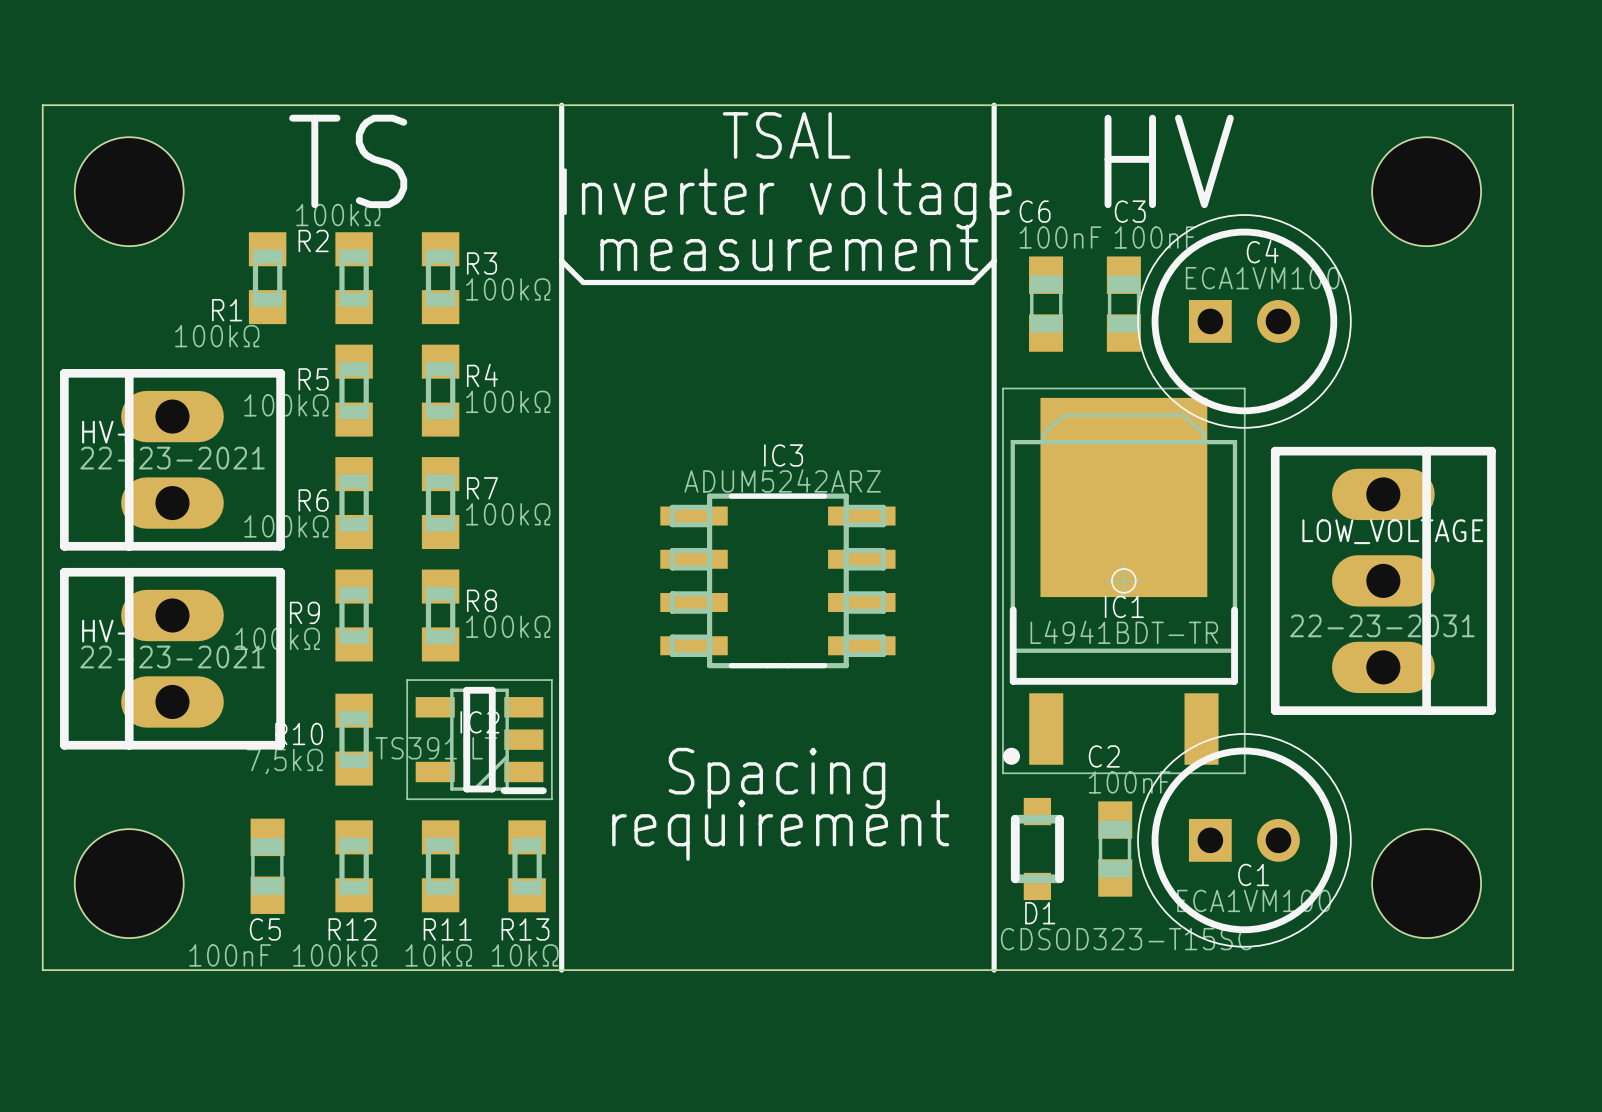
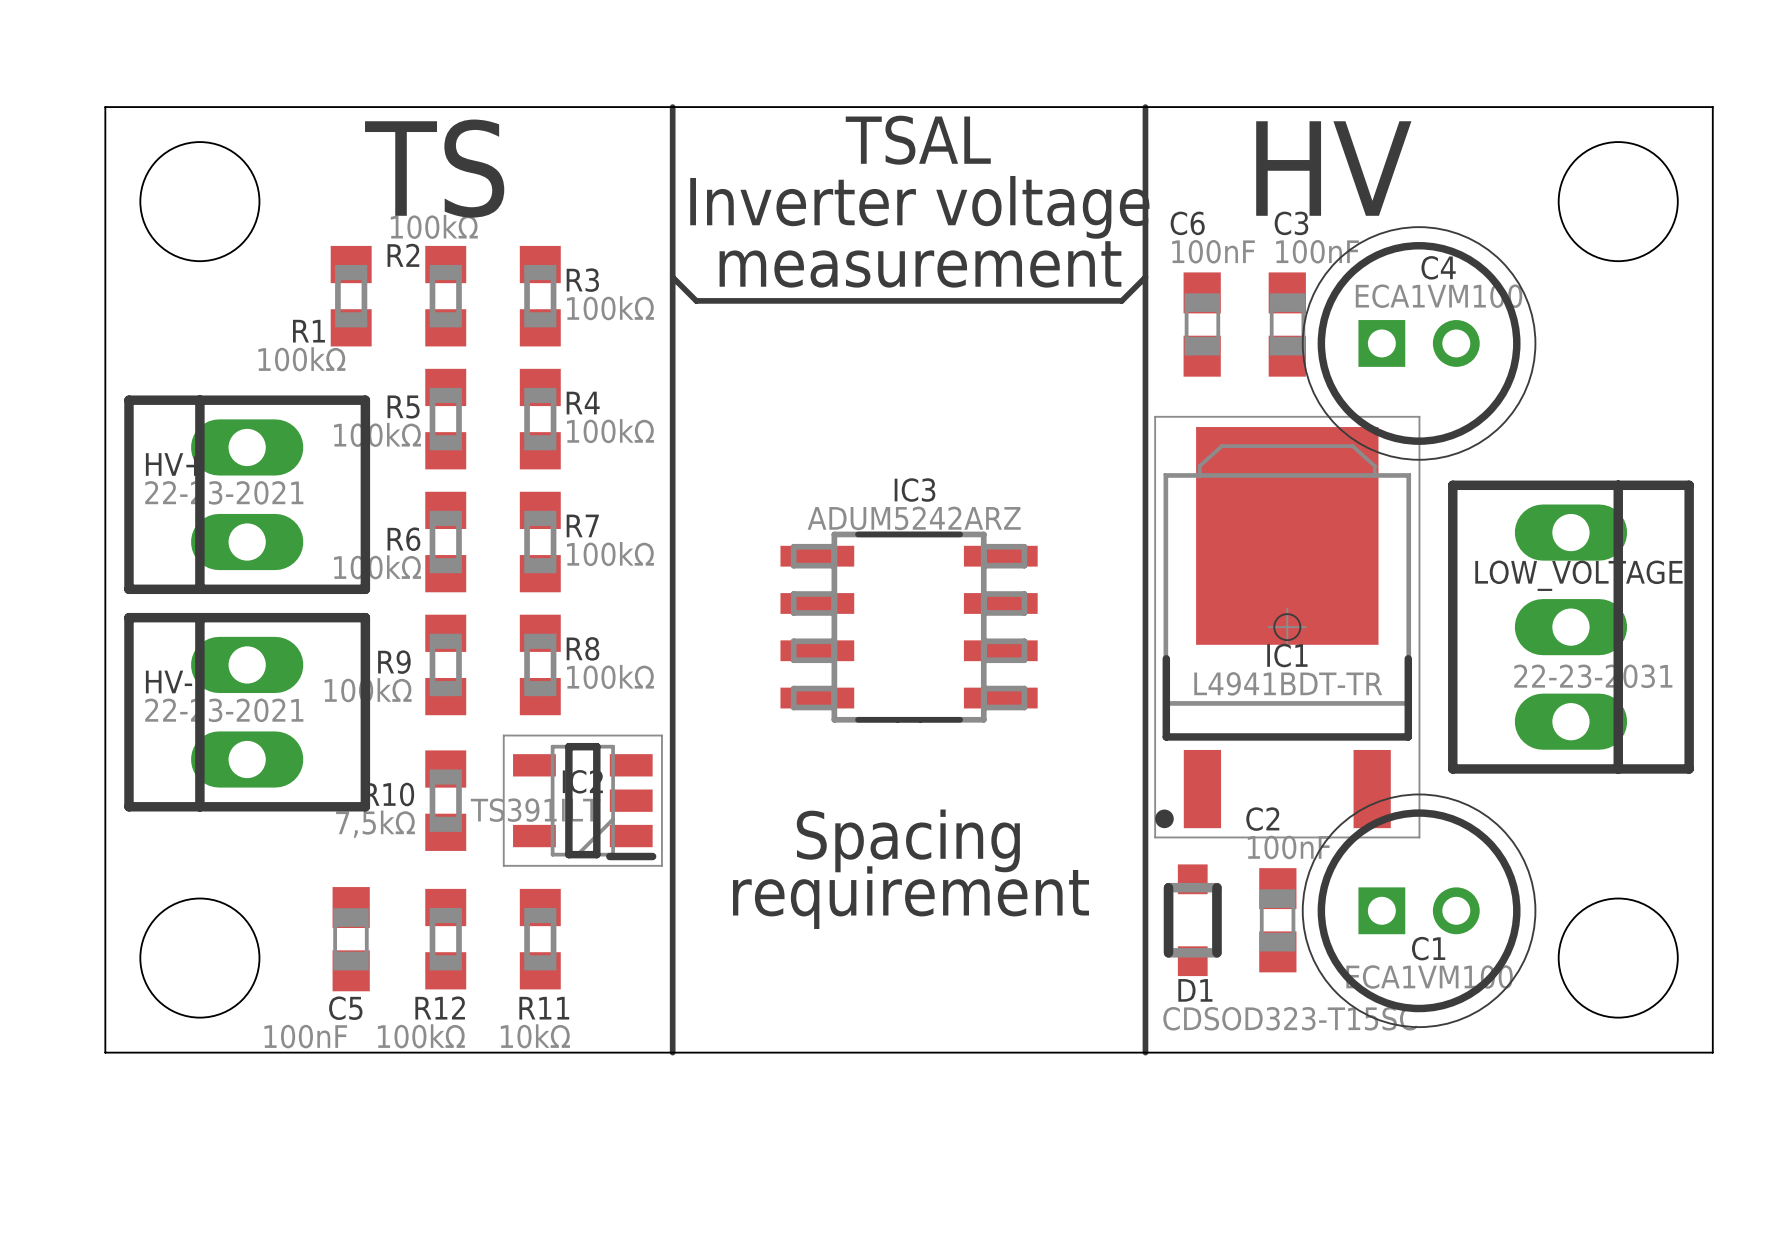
R13: 10kΩ (527, 866) -> none

